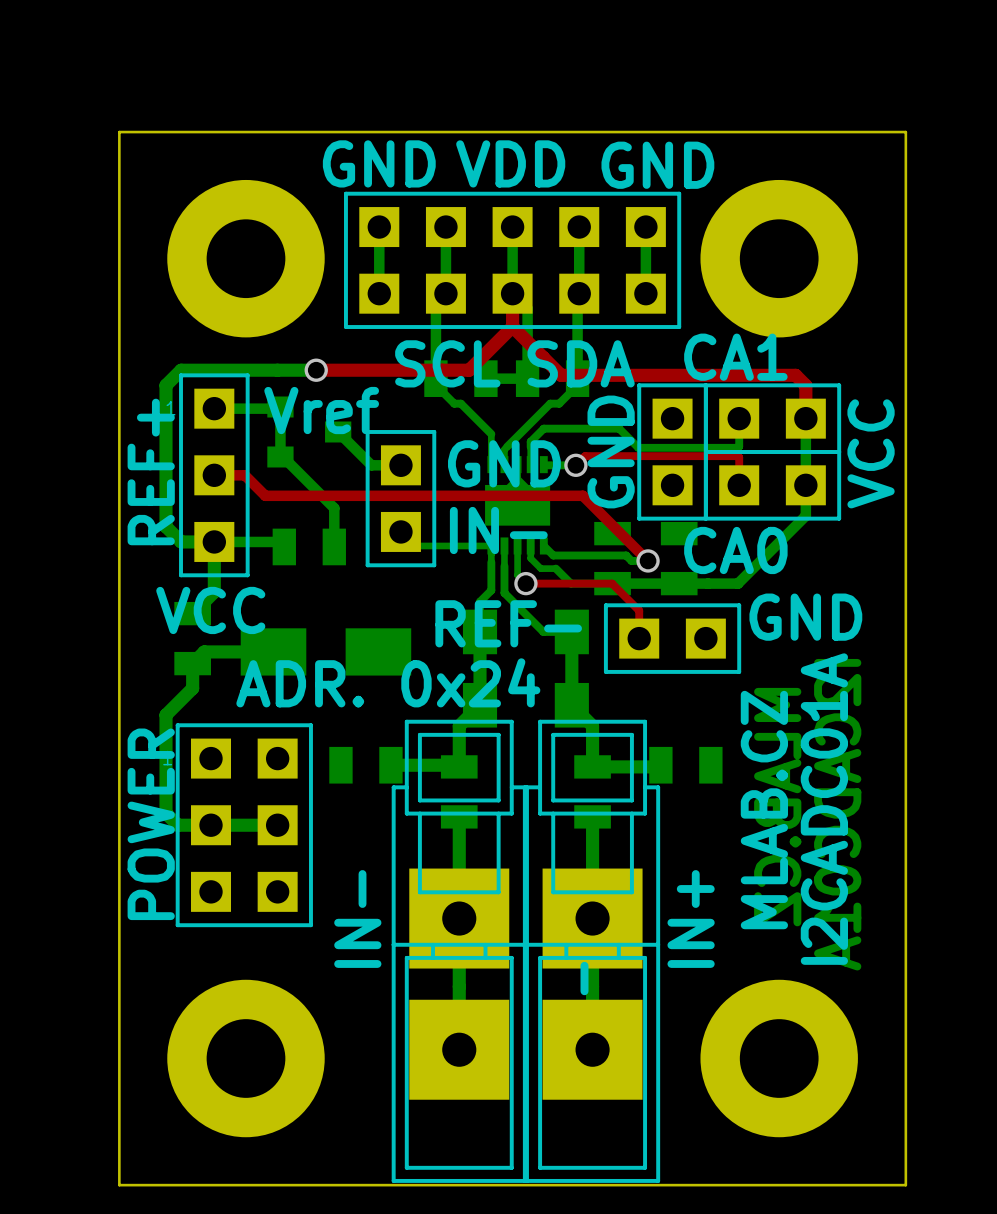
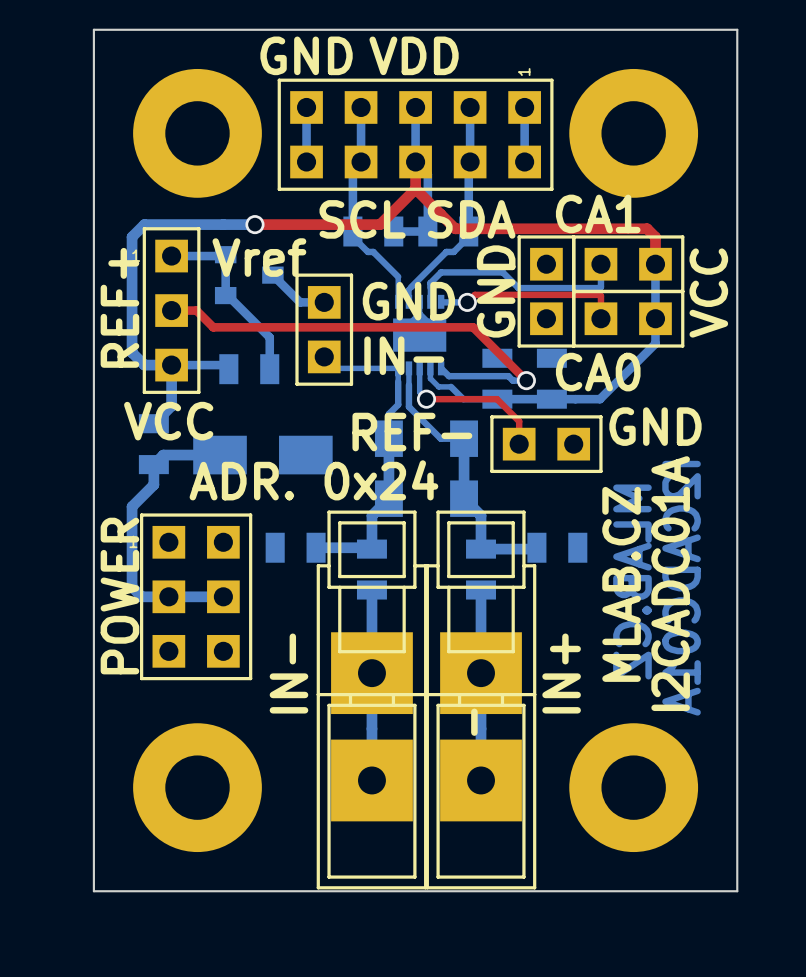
text: GND (657, 165) -> none
part text: none -> 1 (524, 72)

